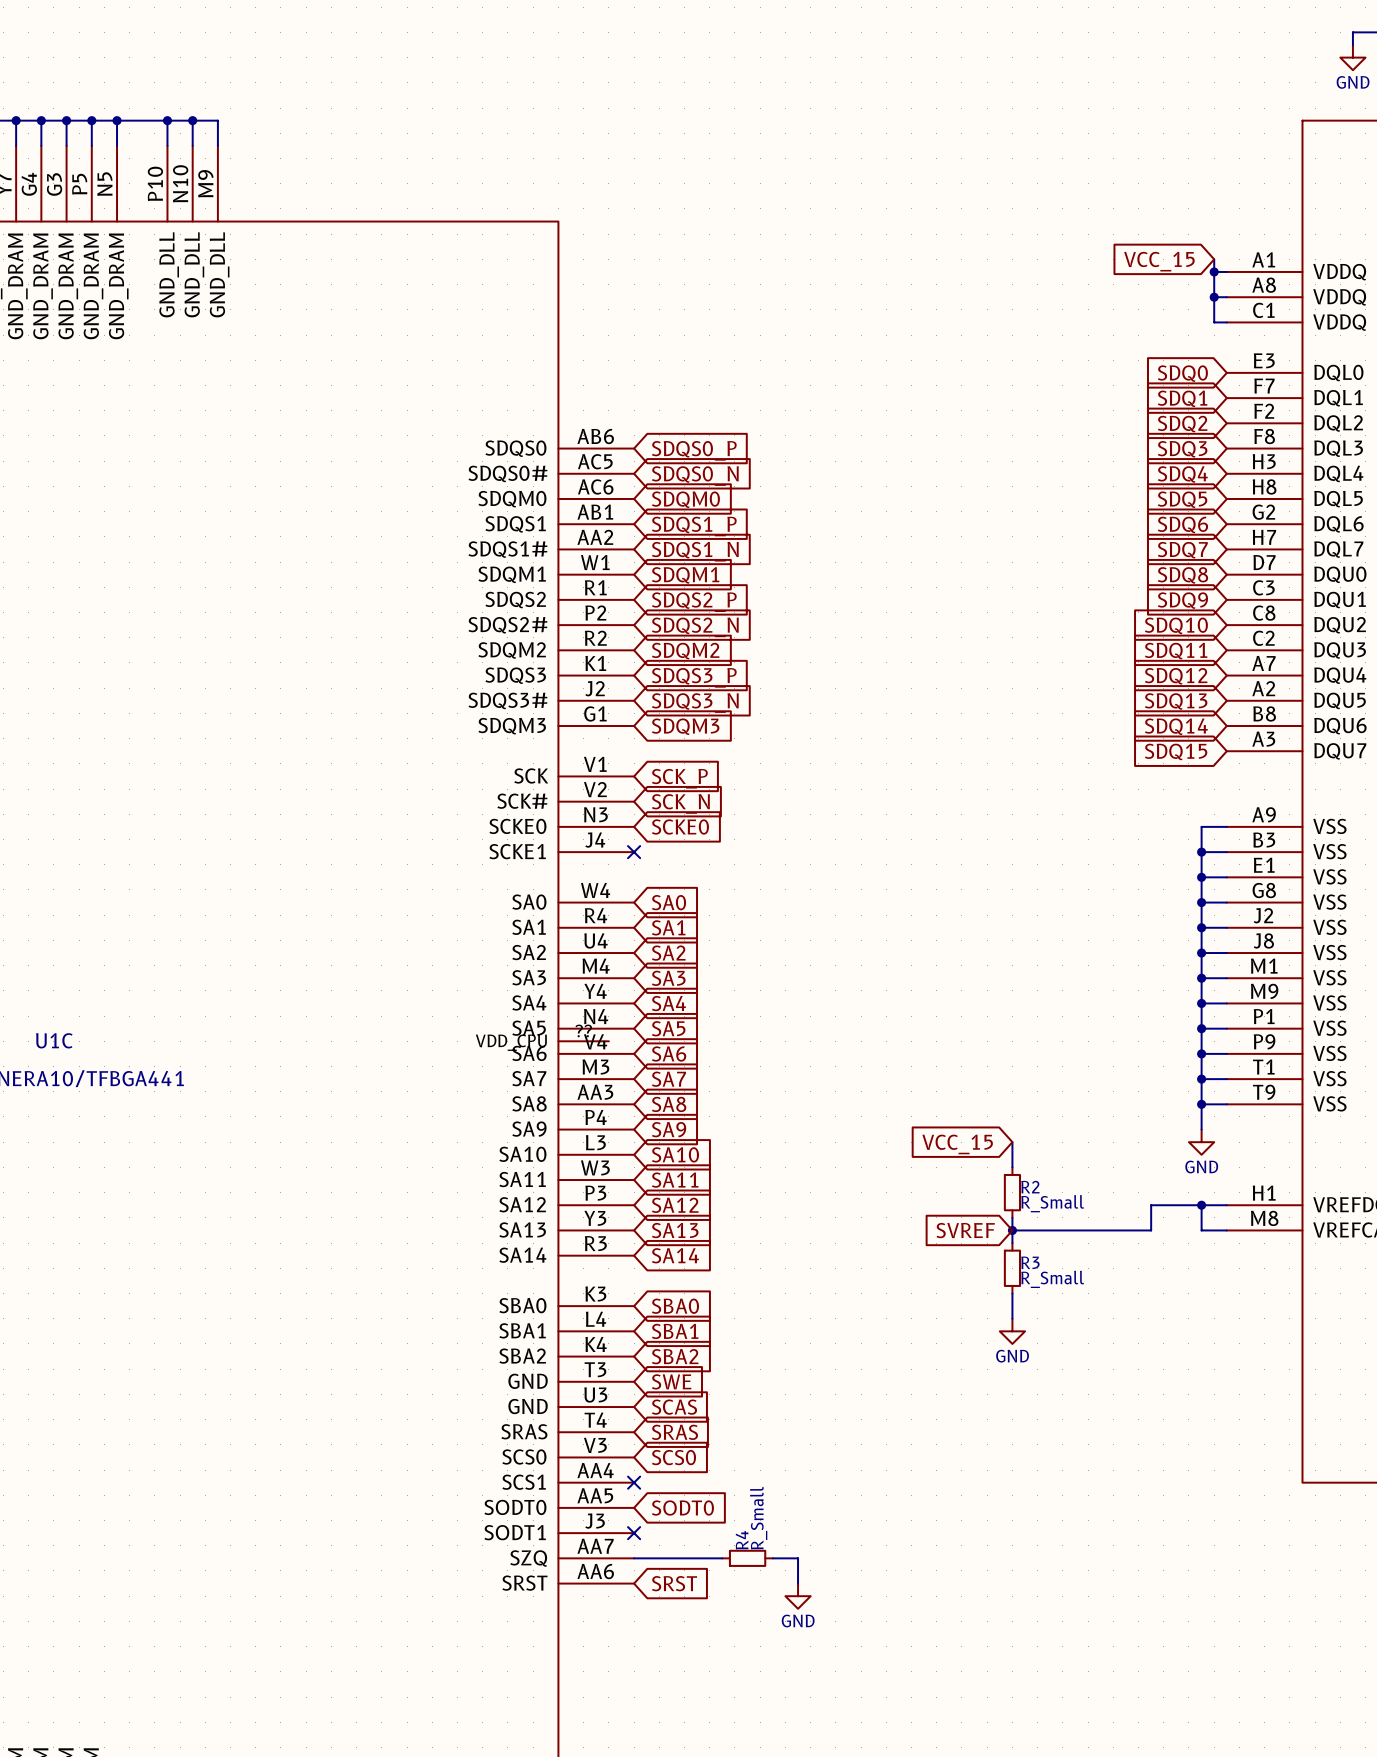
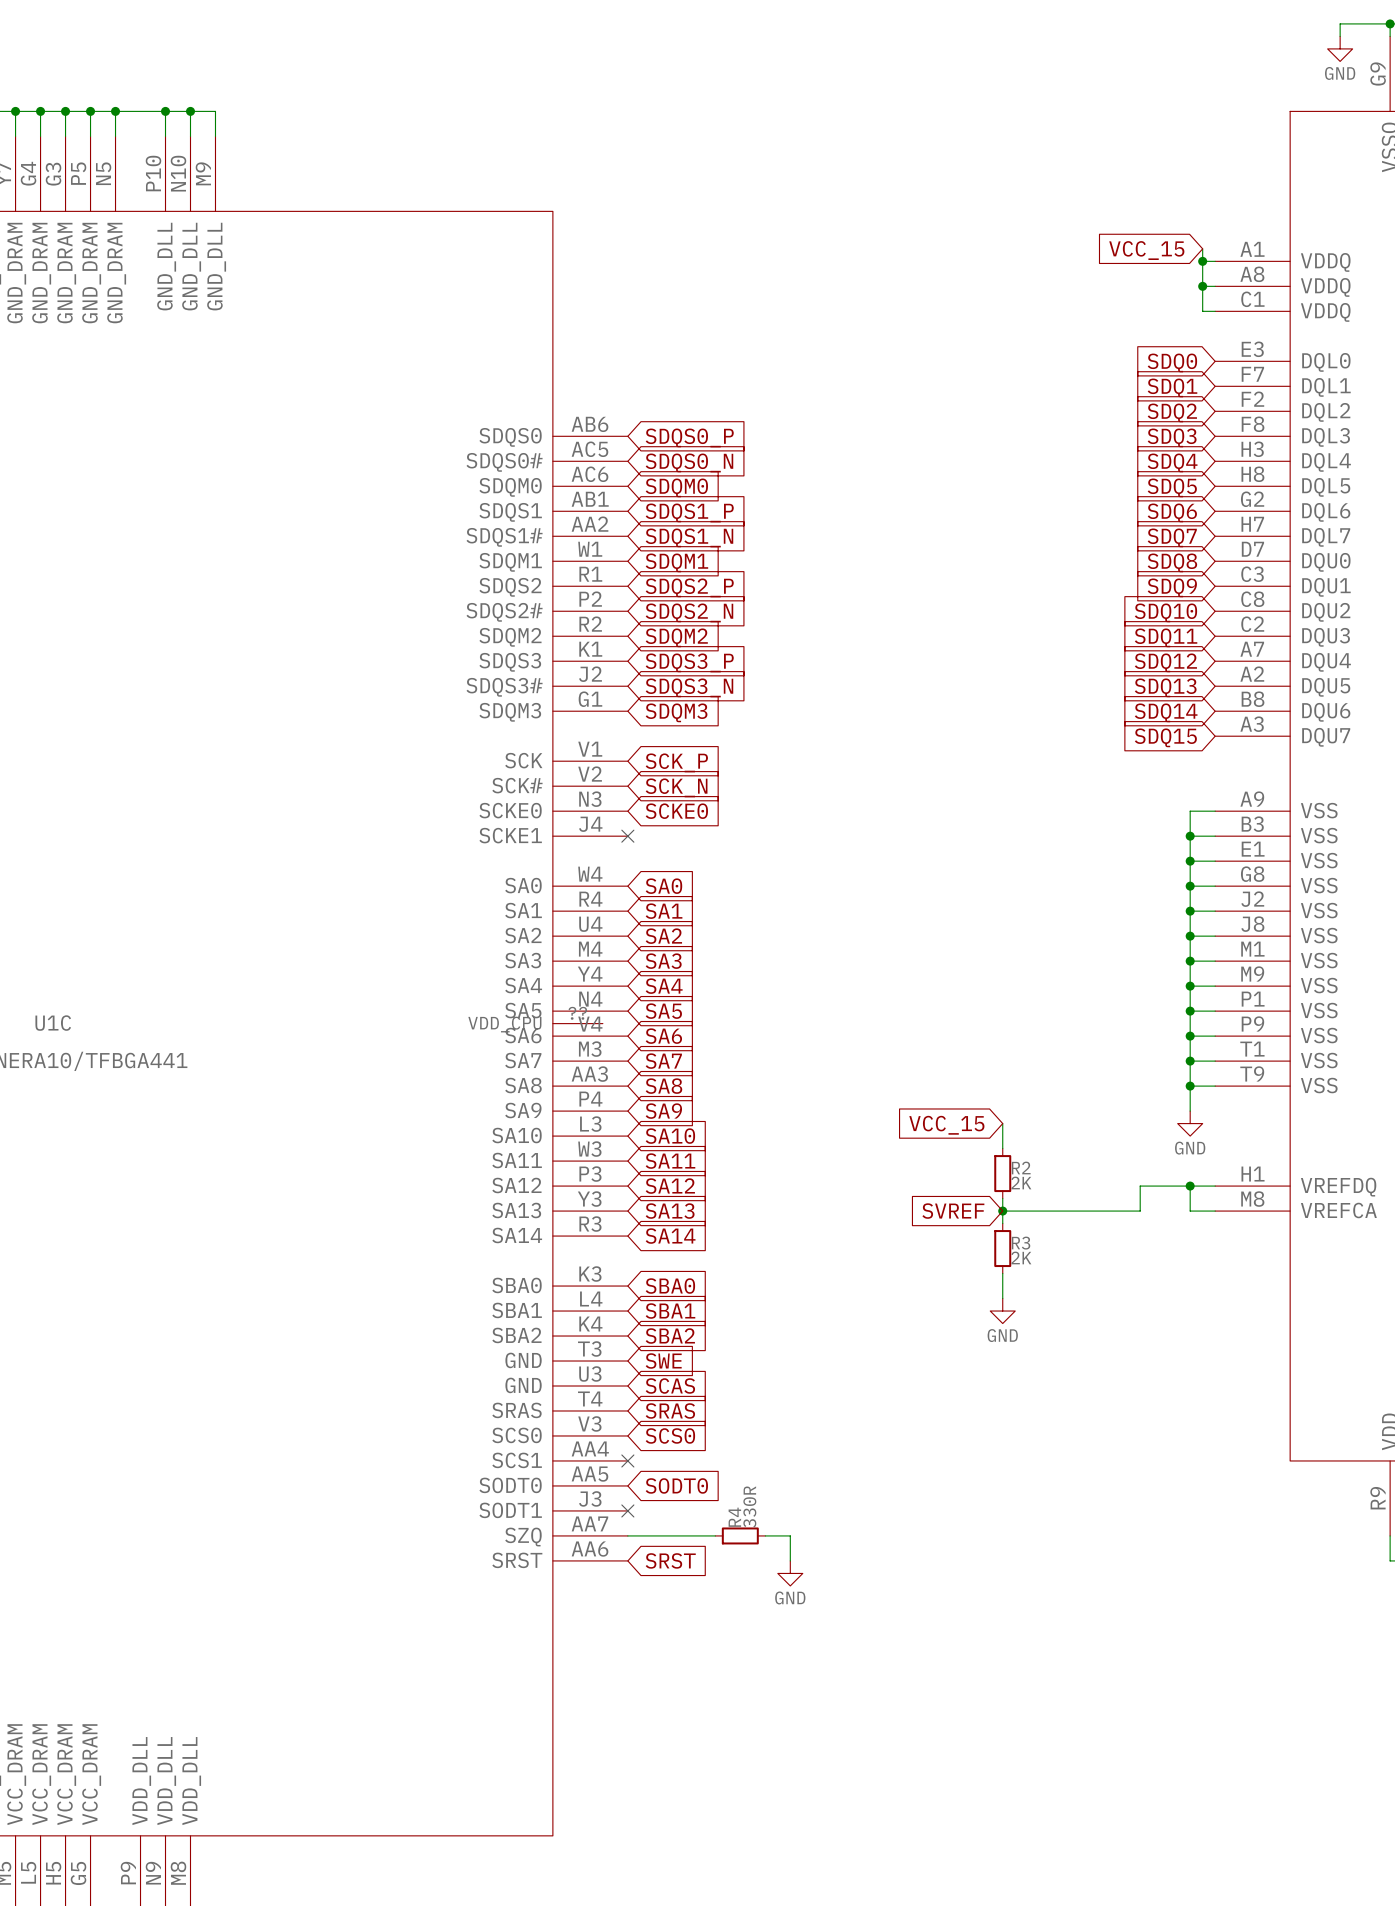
R2 value: R_Small (1052, 1203) -> 2K (1021, 1182)
R3 value: R_Small (1052, 1279) -> 2K (1021, 1257)
R4 value: R_Small (758, 1518) -> 330R (749, 1507)

